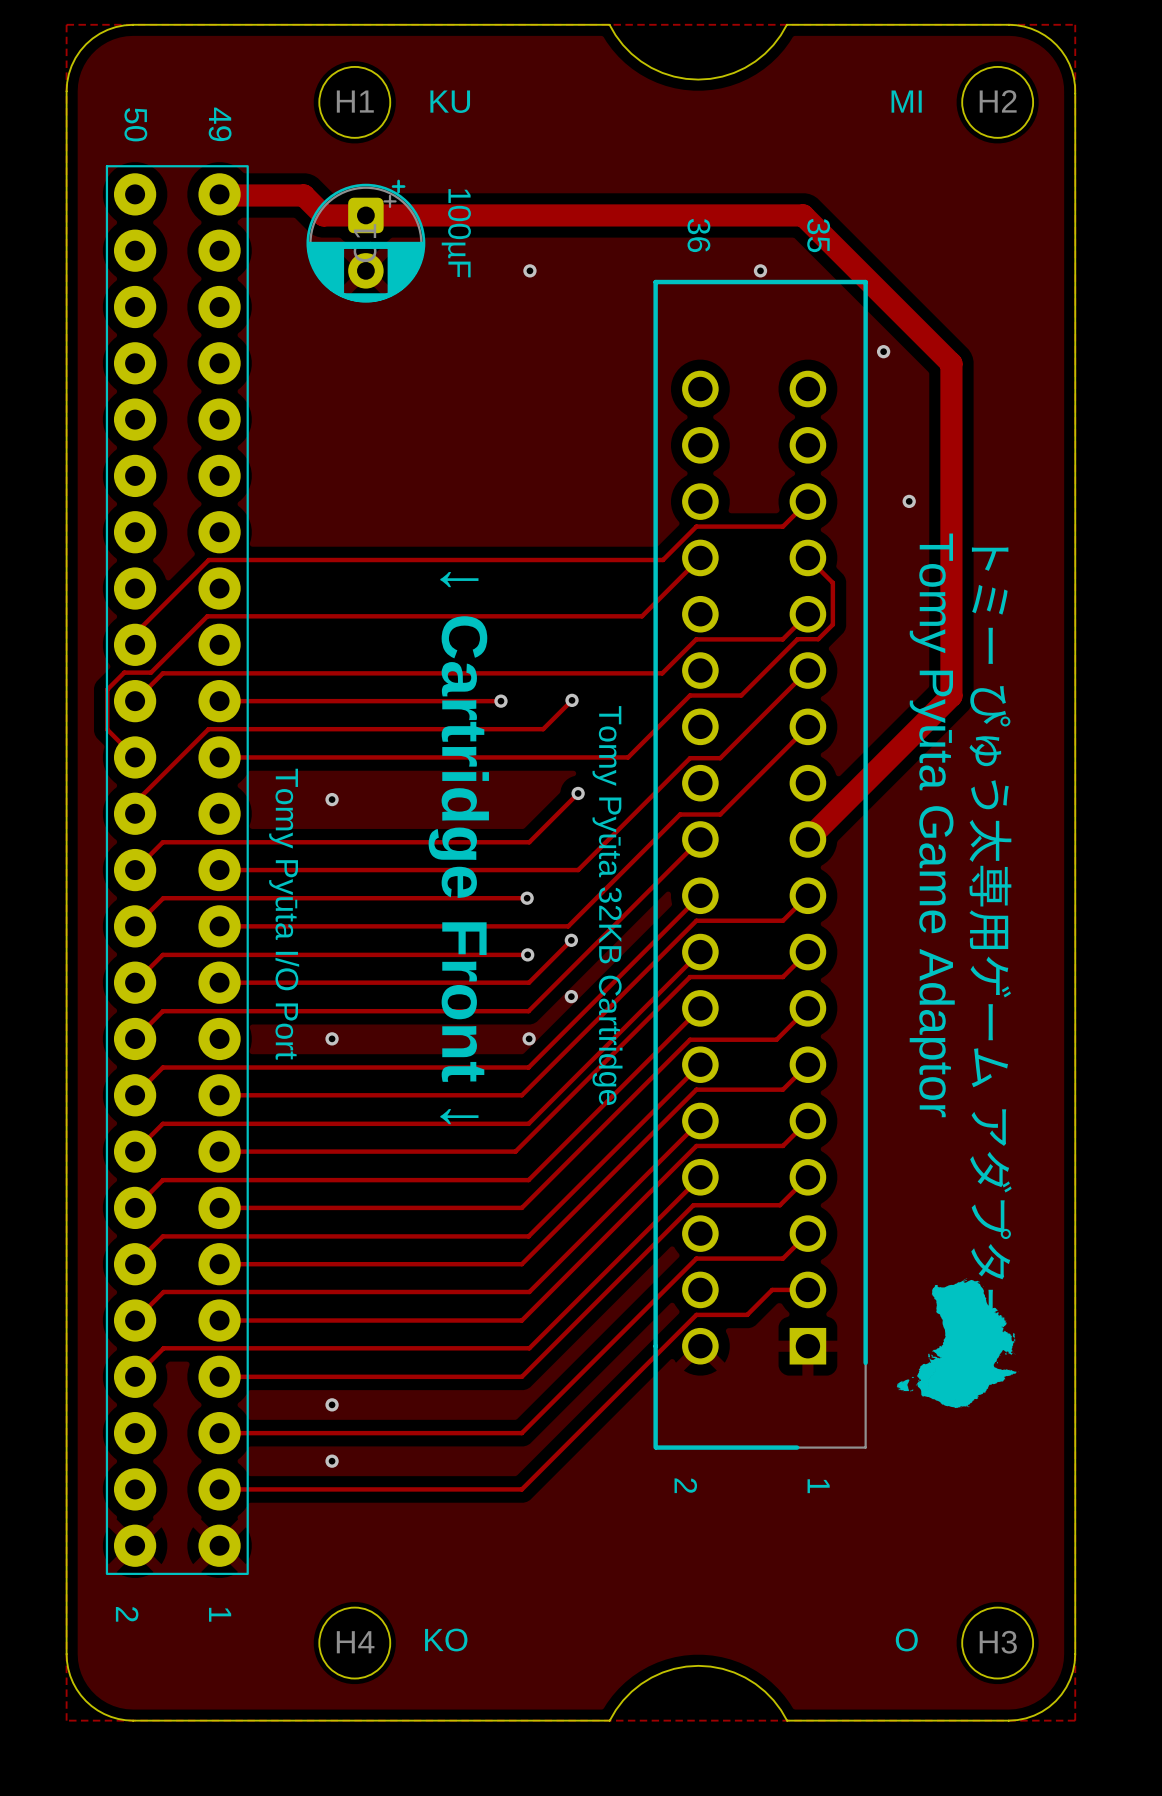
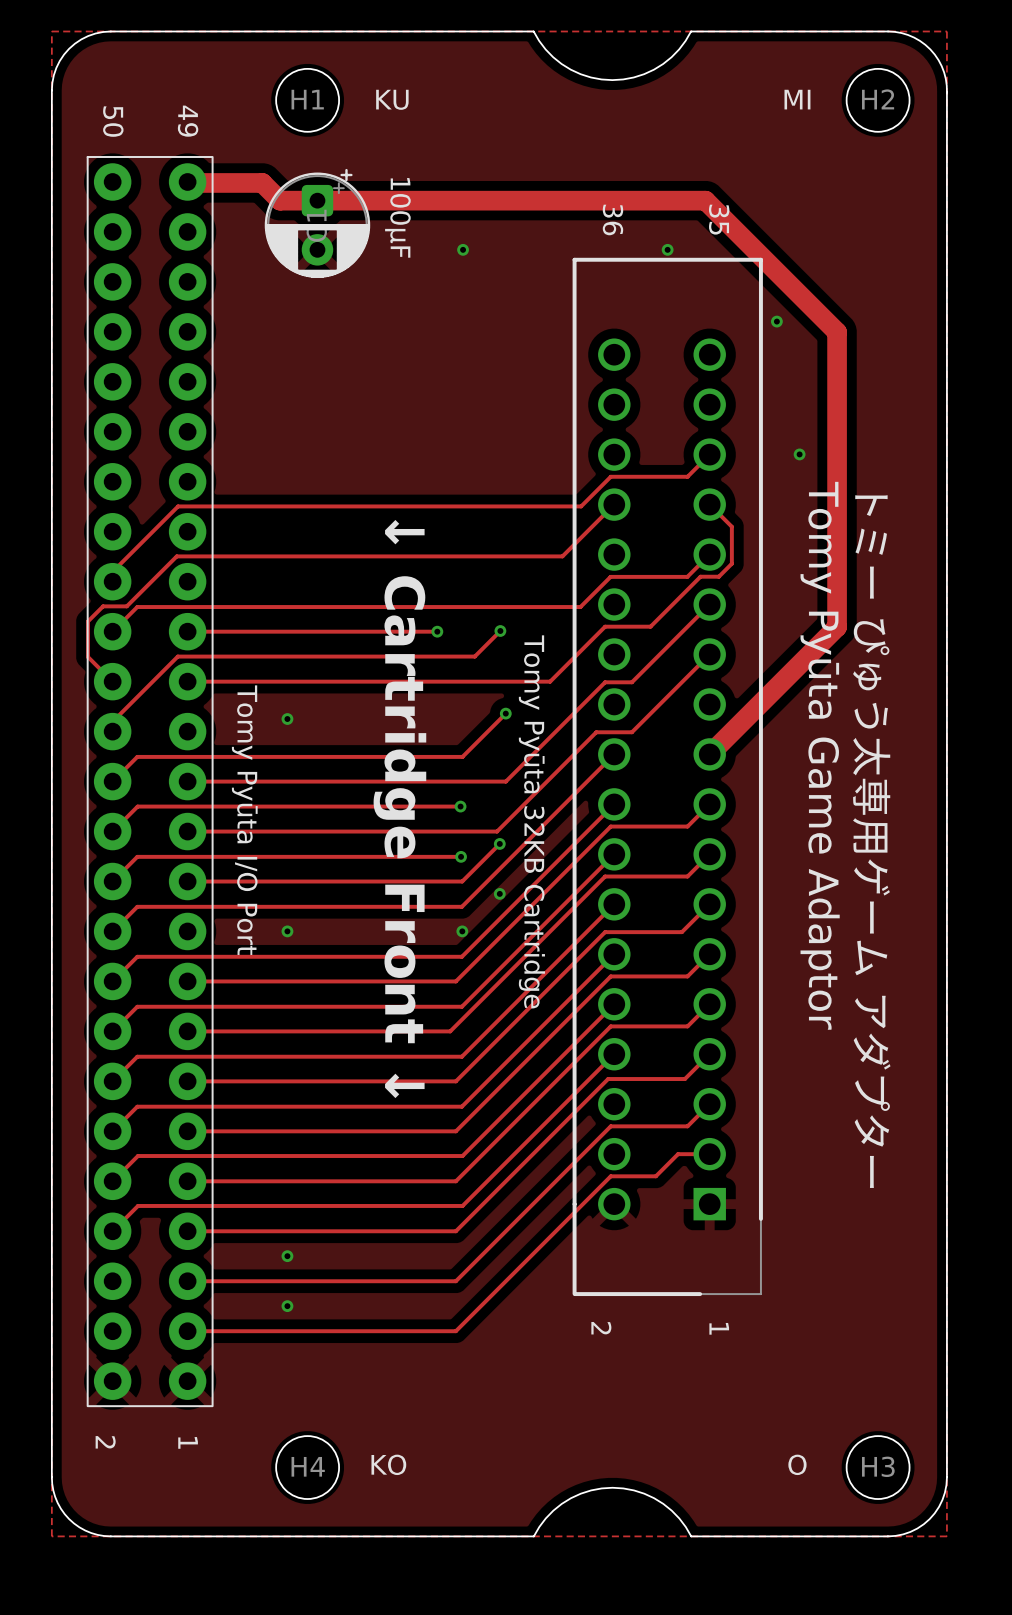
drawing: [896, 1278, 1019, 1409] -> none

